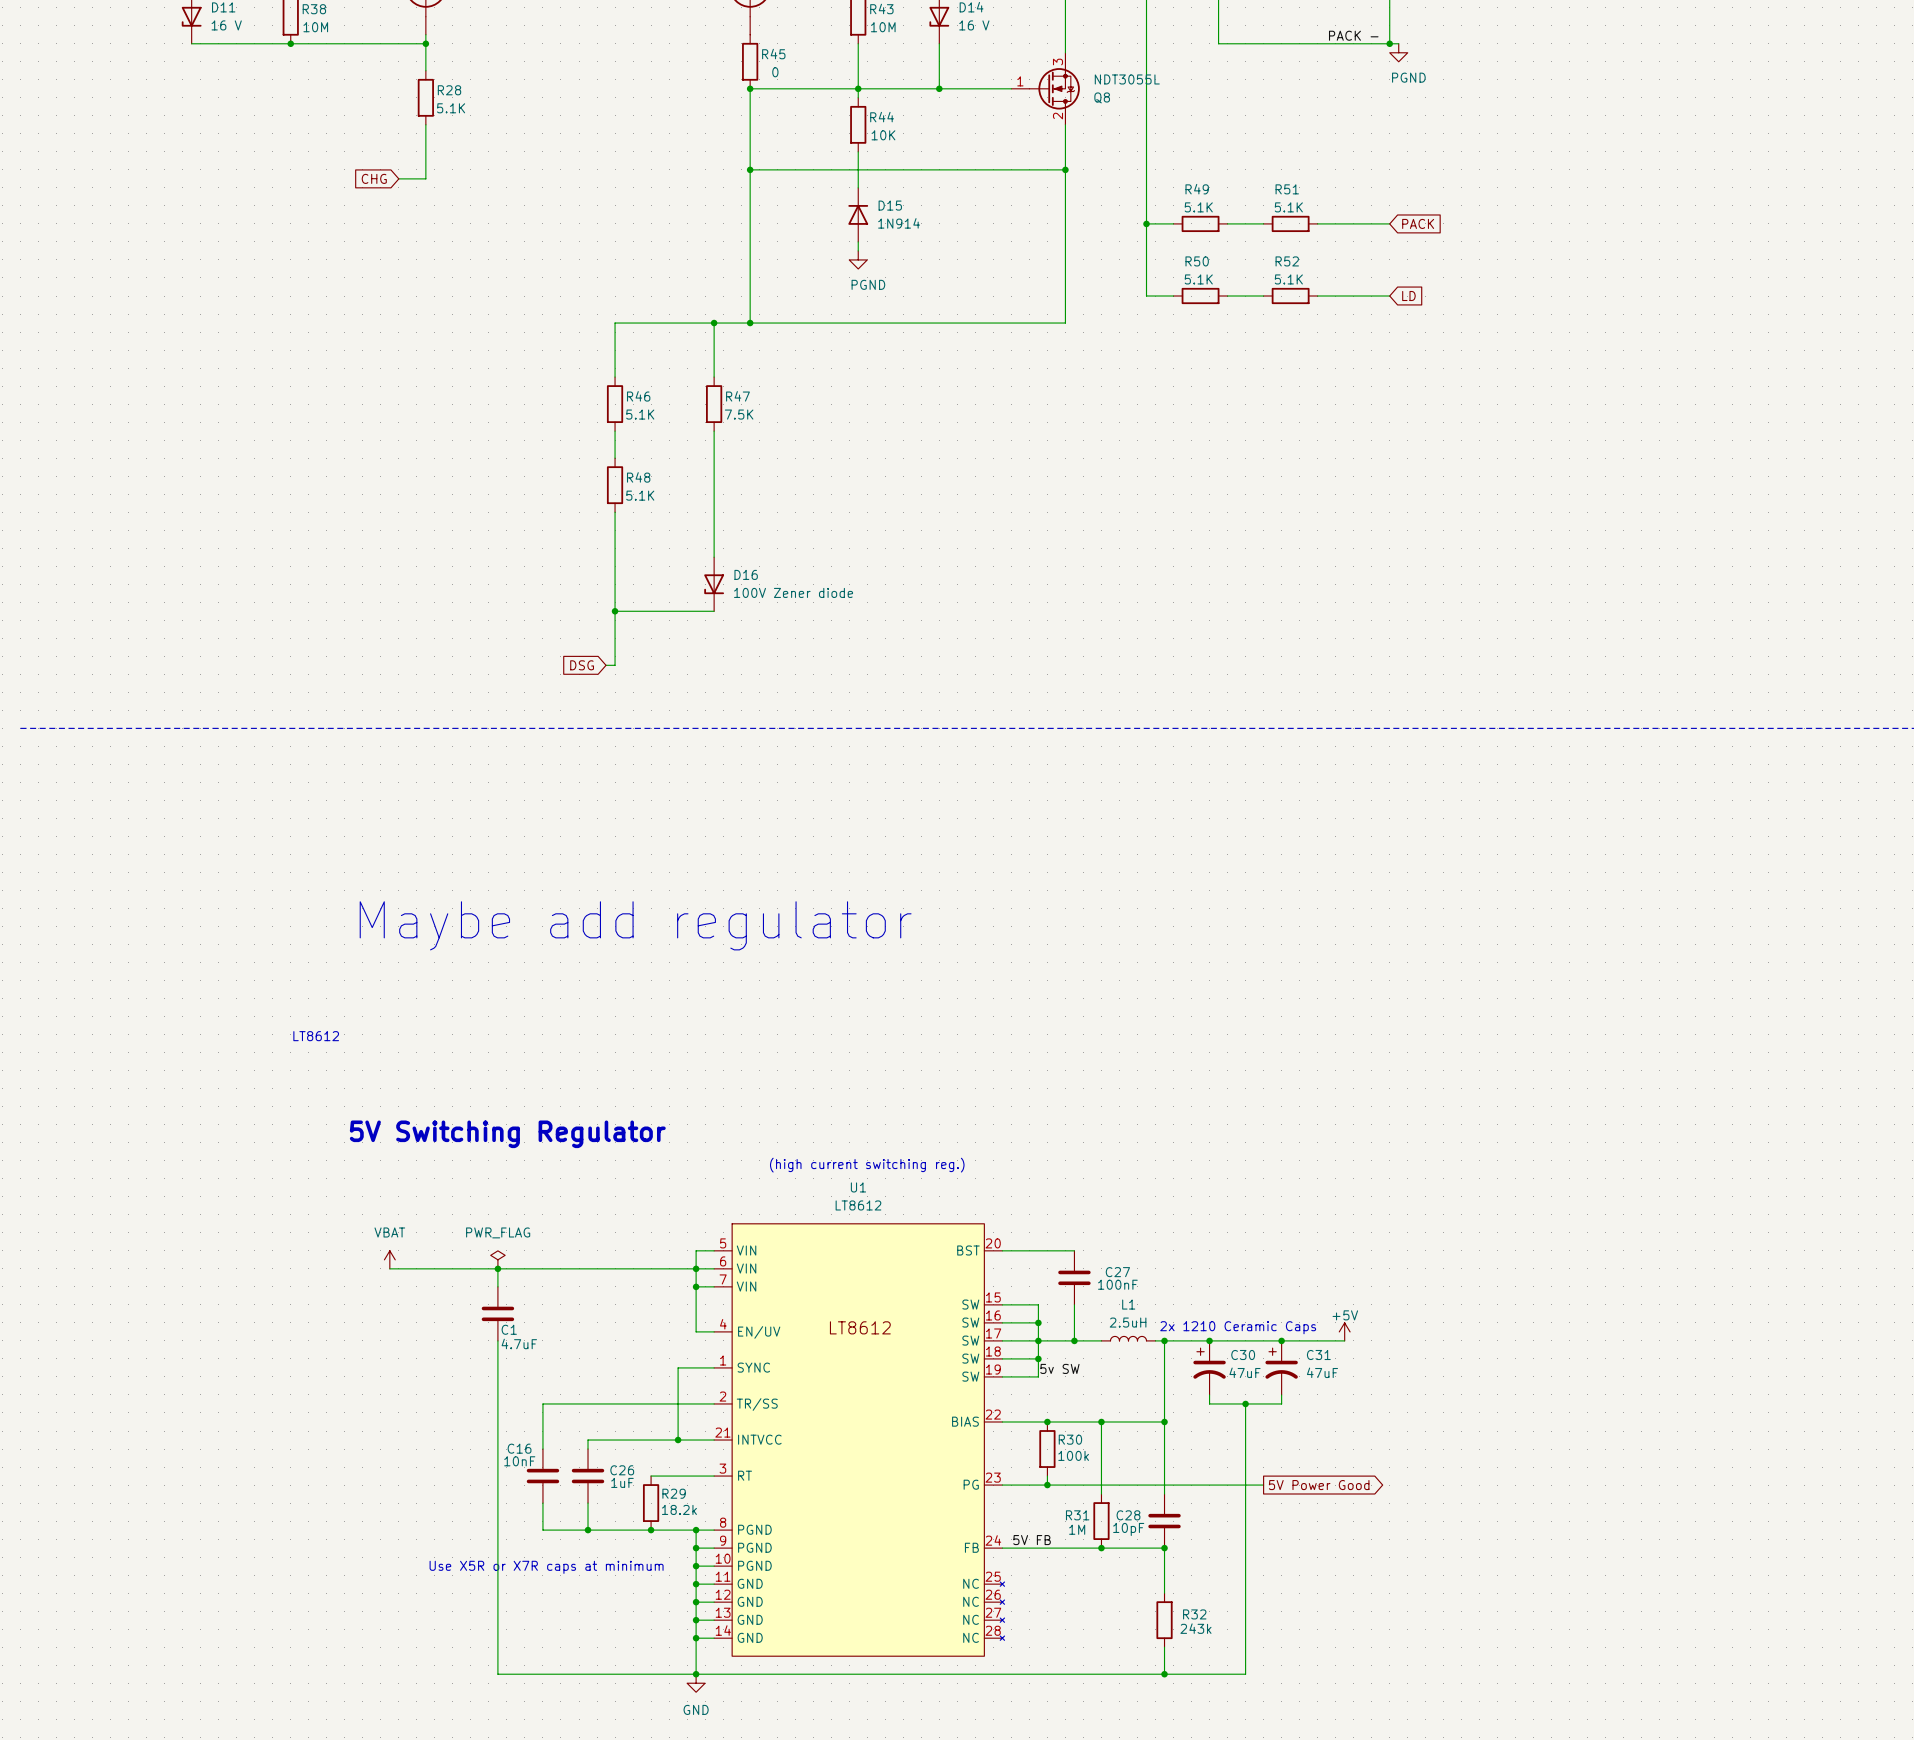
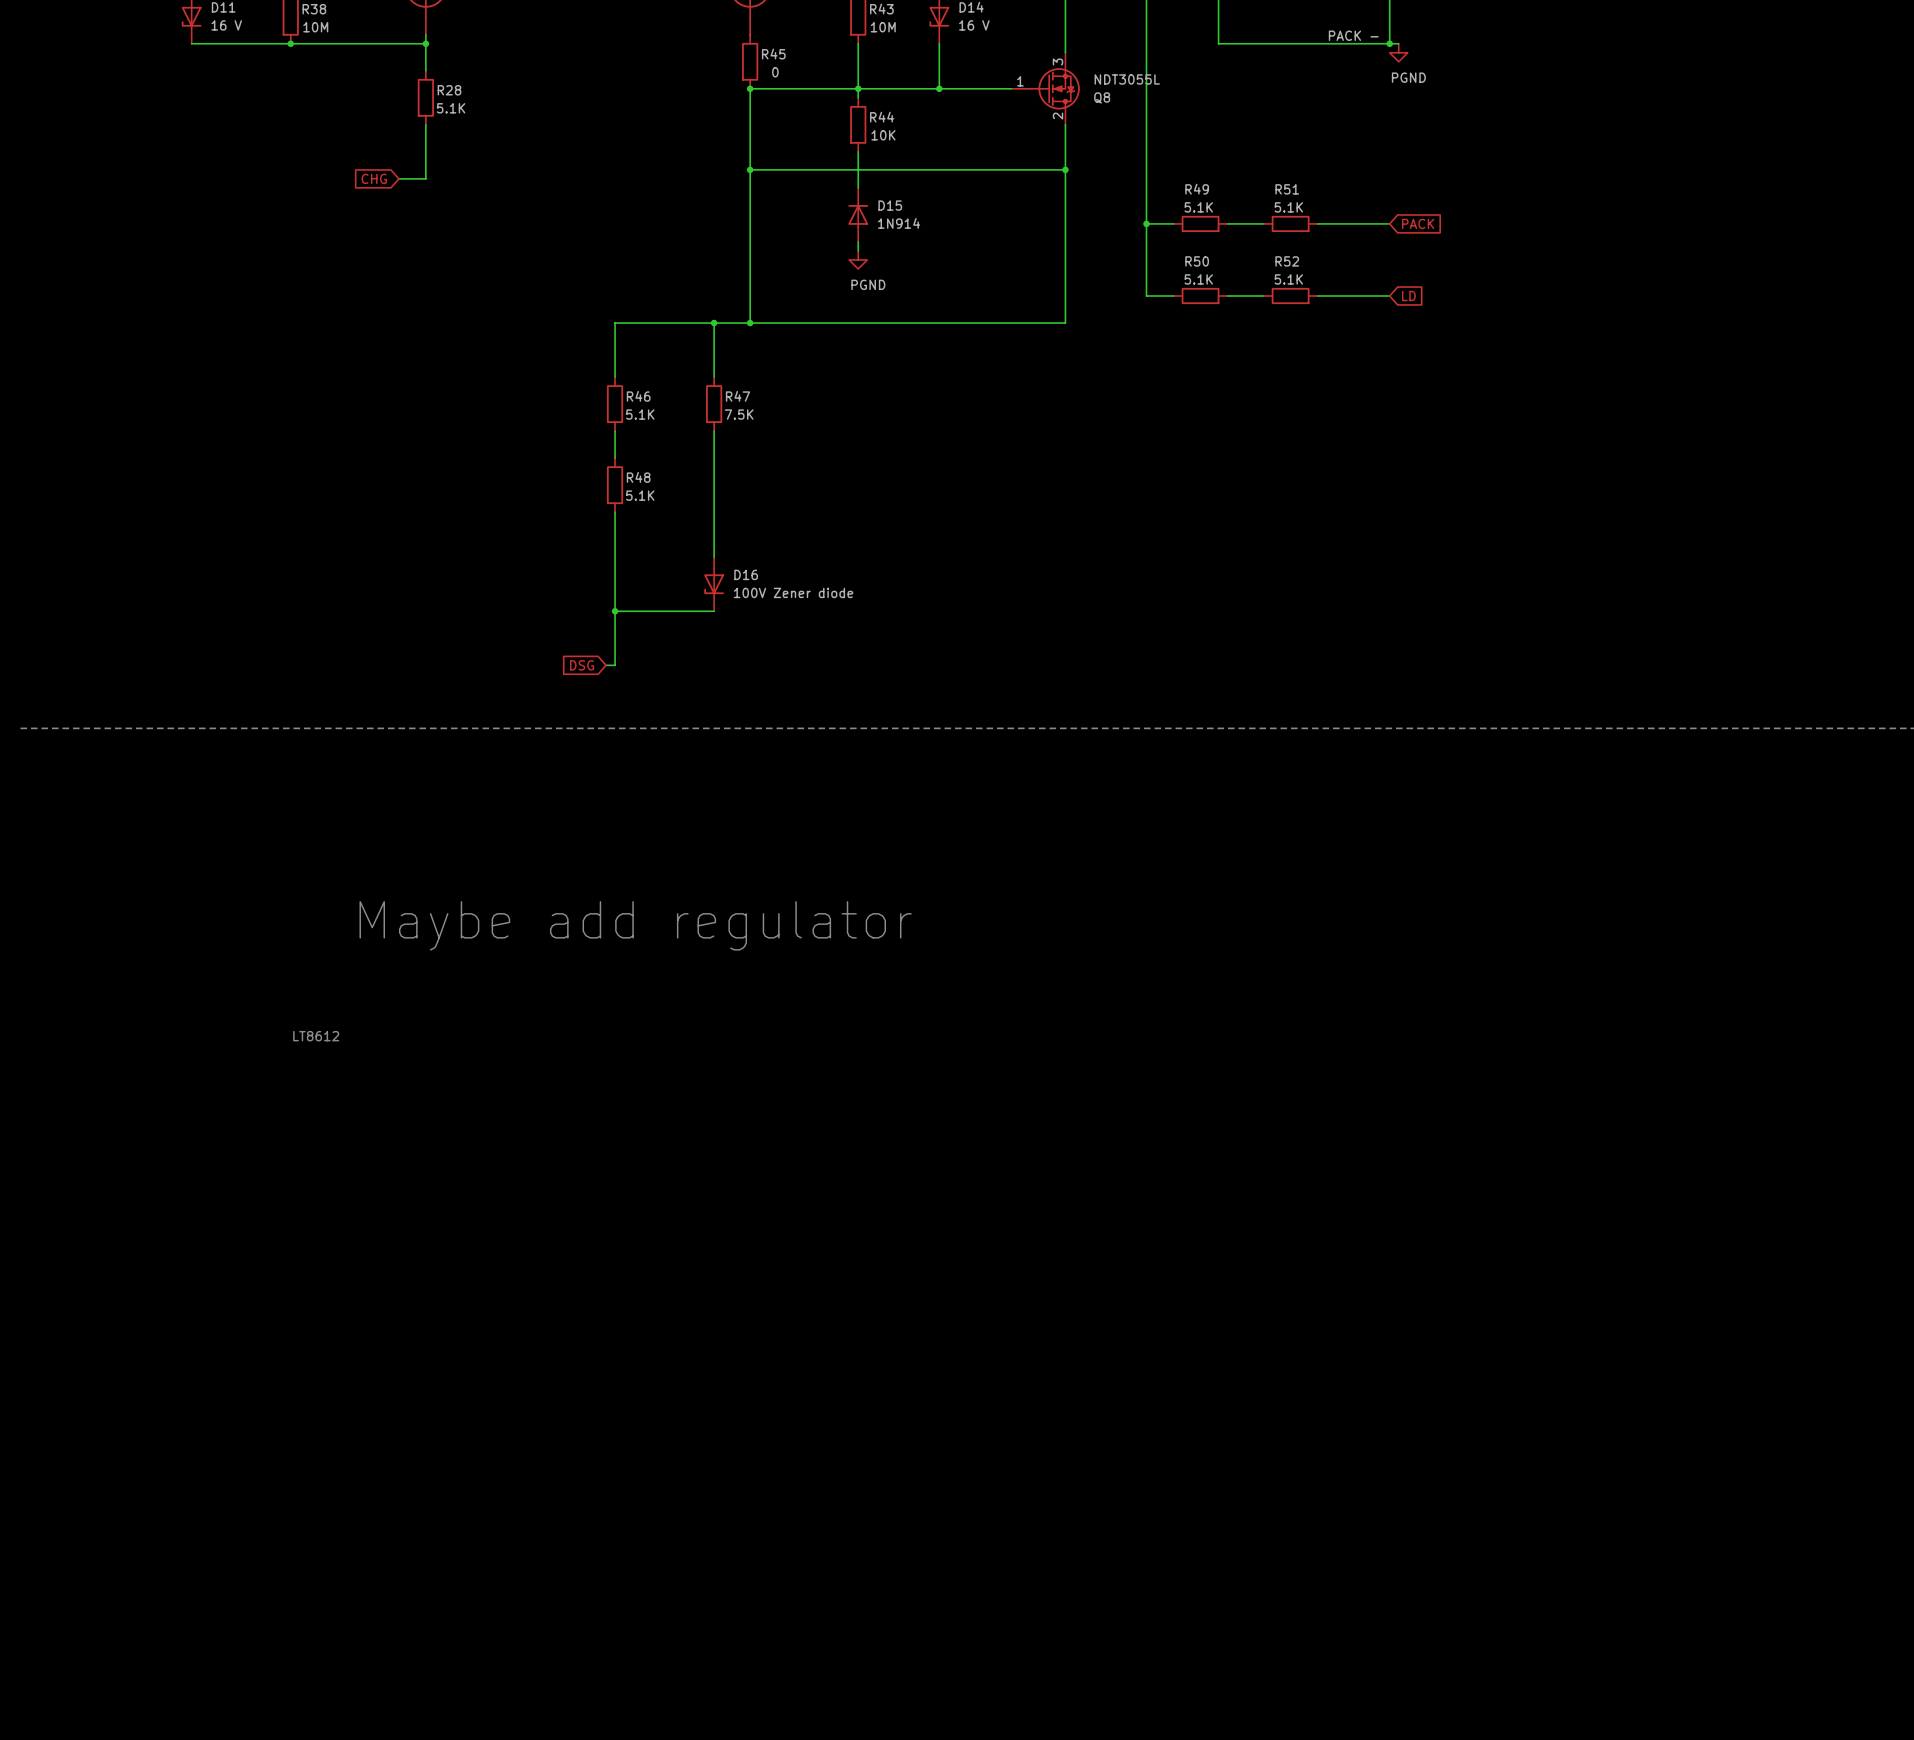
text: 5V Switching Regulator (507, 1134) -> none
text: (high current switching reg.) (867, 1165) -> none
wire: (714, 1250) (696, 1250) (696, 1331) (714, 1331) -> none
wire: (1002, 1250) (1074, 1250) -> none
power symbol: VBAT (389, 1259) -> none
power symbol: PWR_FLAG (497, 1259) -> none
wire: (389, 1268) (714, 1268) -> none
wire: (497, 1268) (497, 1286) -> none
junction: (497, 1268) -> none
junction: (696, 1268) -> none
C27: 100nF (1074, 1277) -> none
wire: (696, 1286) (714, 1286) -> none
junction: (696, 1286) -> none
wire: (1002, 1304) (1038, 1304) (1038, 1376) (1002, 1376) -> none
wire: (1074, 1304) (1074, 1340) -> none
C1: 4.7uF (497, 1313) -> none
wire: (1002, 1322) (1038, 1322) -> none
junction: (1038, 1322) -> none
text: 2x 1210 Ceramic Caps (1238, 1327) -> none
power symbol: +5V (1344, 1331) -> none
L1: 2.5uH (1128, 1338) -> none
wire: (497, 1340) (497, 1674) (1245, 1674) (1245, 1403) -> none
wire: (1002, 1340) (1101, 1340) -> none
junction: (1038, 1340) -> none
junction: (1074, 1340) -> none
wire: (1155, 1340) (1344, 1340) -> none
wire: (1164, 1340) (1164, 1494) -> none
junction: (1164, 1340) -> none
junction: (1209, 1340) -> none
junction: (1281, 1340) -> none
wire: (1002, 1358) (1038, 1358) -> none
junction: (1038, 1358) -> none
wire: (714, 1367) (678, 1367) (678, 1440) -> none
C30: 47uF (1209, 1367) -> none
C31: 47uF (1281, 1367) -> none
label: 5v SW (1059, 1368) -> none
wire: (1209, 1394) (1209, 1403) (1281, 1403) (1281, 1394) -> none
wire: (714, 1403) (542, 1403) (542, 1449) -> none
junction: (1245, 1403) -> none
wire: (1002, 1421) (1164, 1421) -> none
junction: (1047, 1421) -> none
wire: (1101, 1421) (1101, 1494) -> none
junction: (1101, 1421) -> none
junction: (1164, 1421) -> none
junction: (678, 1440) -> none
wire: (714, 1440) (588, 1440) (588, 1449) -> none
U1: LT8612 (859, 1440) -> none
R30: 100k (1047, 1449) -> none
C16: 10nF (542, 1476) -> none
C26: 1uF (588, 1476) -> none
wire: (651, 1476) (714, 1476) -> none
wire: (1047, 1476) (1047, 1485) -> none
wire: (1002, 1485) (1263, 1485) -> none
junction: (1047, 1485) -> none
global label: 5V Power Good (1319, 1485) -> none
wire: (542, 1503) (542, 1530) (714, 1530) -> none
wire: (588, 1503) (588, 1530) -> none
R29: 18.2k (651, 1503) -> none
R31: 1M (1101, 1521) -> none
C28: 10pF (1164, 1521) -> none
junction: (588, 1530) -> none
junction: (651, 1530) -> none
wire: (696, 1530) (696, 1674) -> none
junction: (696, 1530) -> none
label: 5V FB (1032, 1540) -> none
wire: (696, 1548) (714, 1548) -> none
junction: (696, 1548) -> none
wire: (1002, 1548) (1164, 1548) (1164, 1593) -> none
junction: (1101, 1548) -> none
junction: (1164, 1548) -> none
wire: (696, 1566) (714, 1566) -> none
junction: (696, 1566) -> none
text: Use X5R or X7R caps at minimum (546, 1567) -> none
wire: (696, 1584) (714, 1584) -> none
junction: (696, 1584) -> none
wire: (696, 1602) (714, 1602) -> none
junction: (696, 1602) -> none
wire: (696, 1620) (714, 1620) -> none
junction: (696, 1620) -> none
R32: 243k (1164, 1620) -> none
wire: (696, 1638) (714, 1638) -> none
junction: (696, 1638) -> none
wire: (1164, 1647) (1164, 1674) -> none
junction: (696, 1674) -> none
junction: (1164, 1674) -> none
power symbol: GND (696, 1683) -> none

